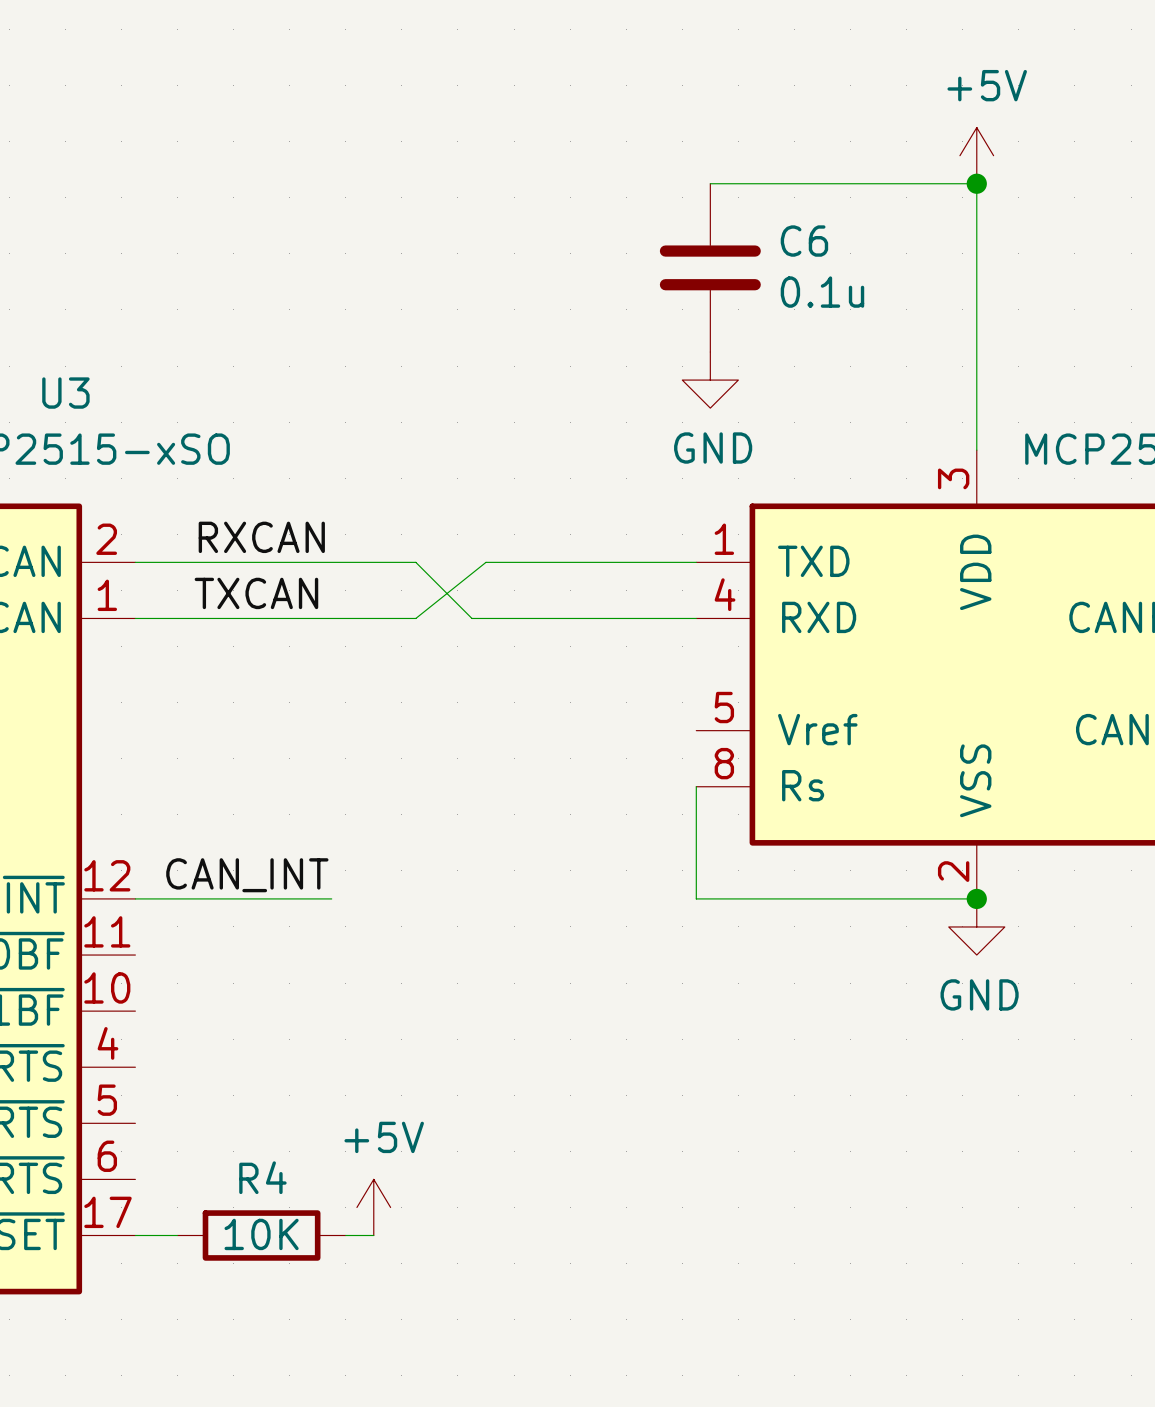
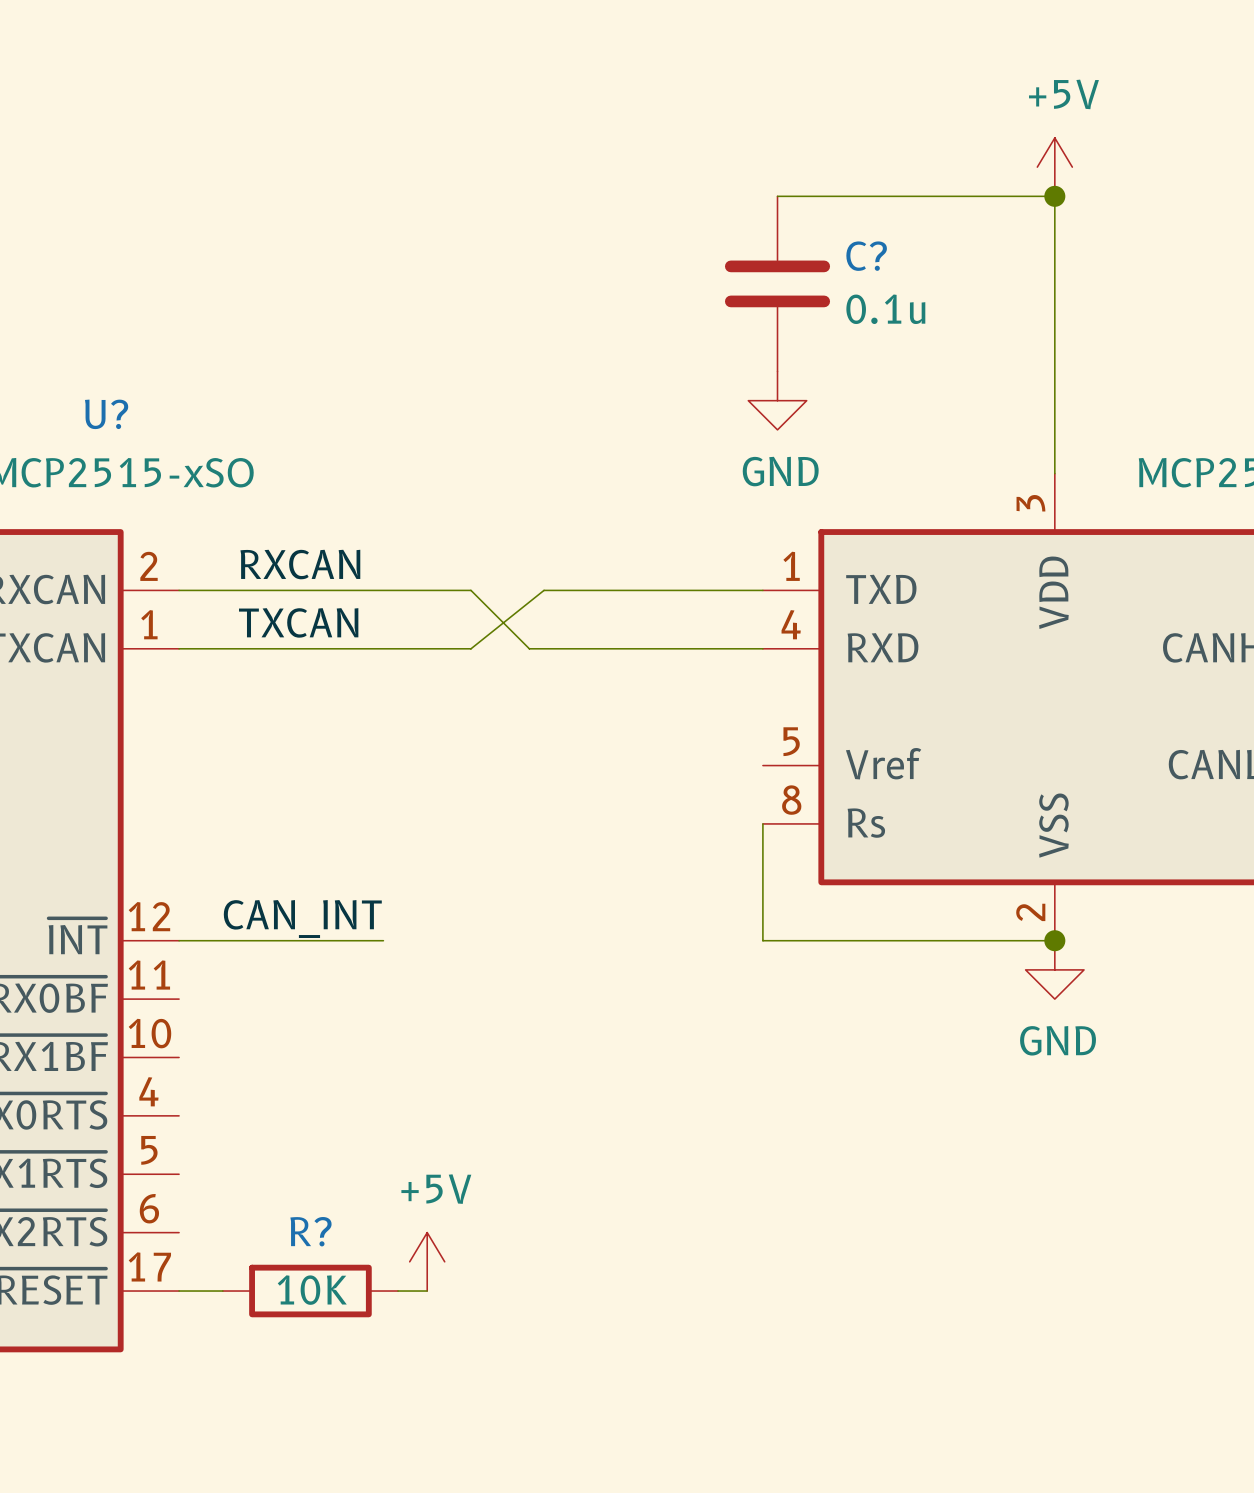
C6 name: C6 (804, 241) -> C? (866, 256)
U3 name: U3 (65, 393) -> U? (106, 414)
R4 name: R4 (262, 1177) -> R? (310, 1231)

